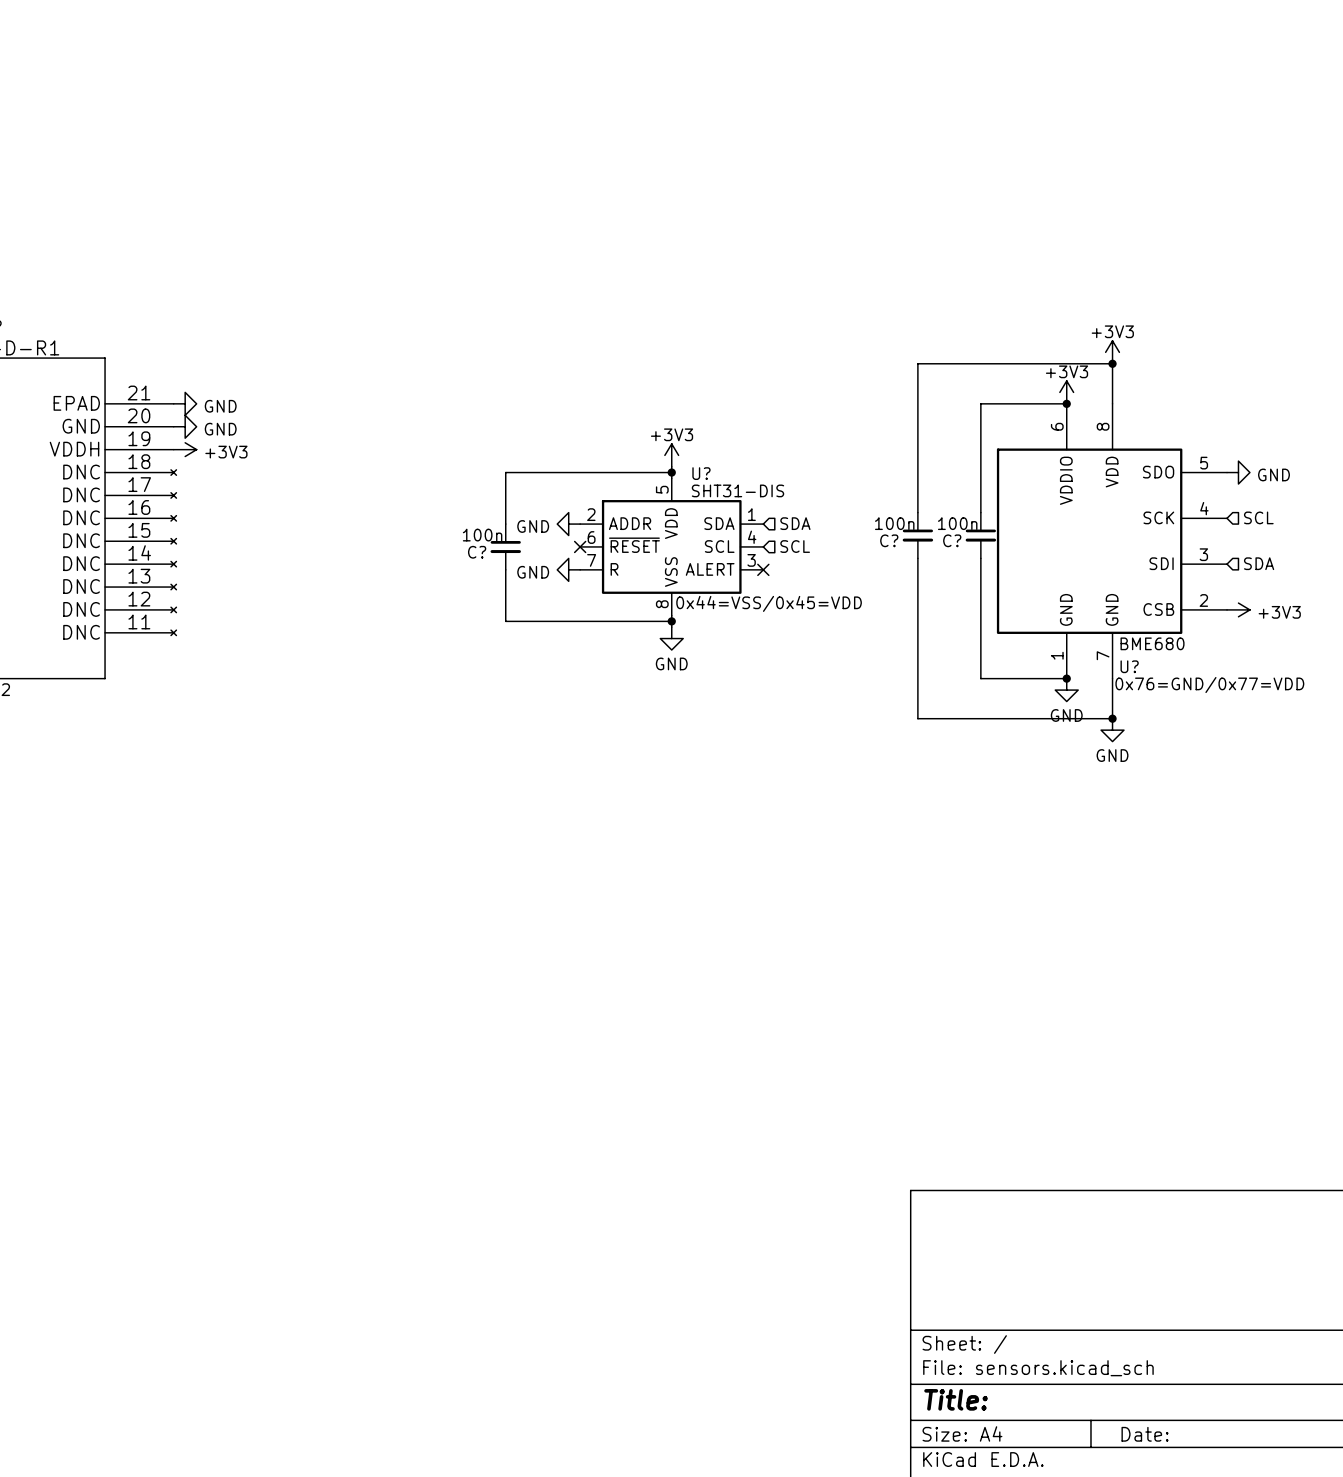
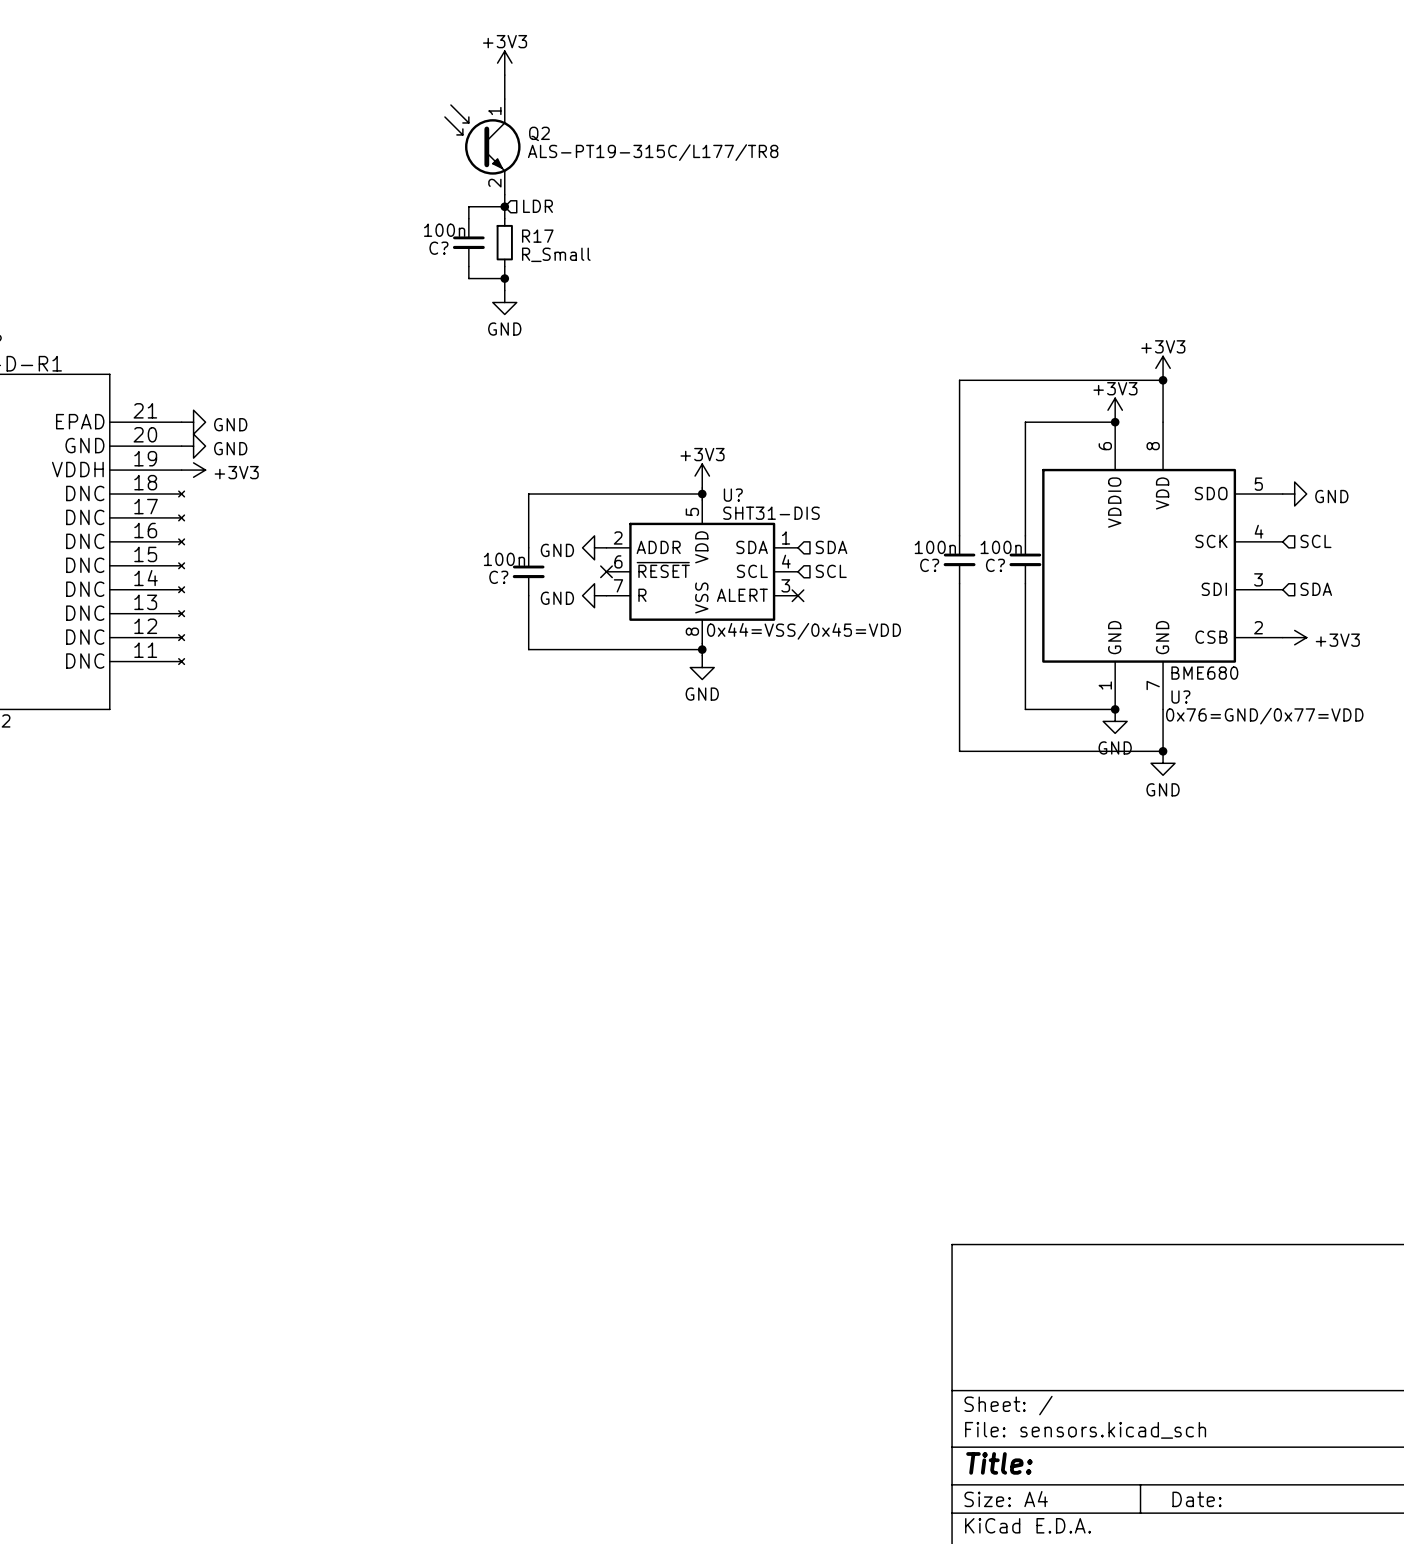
power symbol: none -> +3V3 (504, 63)
wire: none -> (504, 75) (504, 99)
Q2: none -> ALS-PT19-315C/L177/TR8 (482, 146)
wire: none -> (504, 194) (504, 218)
wire: none -> (504, 206) (468, 206) (468, 218)
junction: none -> (504, 206)
hierarchical label: none -> LDR (538, 206)
C?: none -> 100n (468, 242)
R17: none -> R_Small (504, 242)
wire: none -> (468, 266) (468, 278) (504, 278)
wire: none -> (504, 266) (504, 290)
junction: none -> (504, 278)
power symbol: none -> GND (504, 302)

